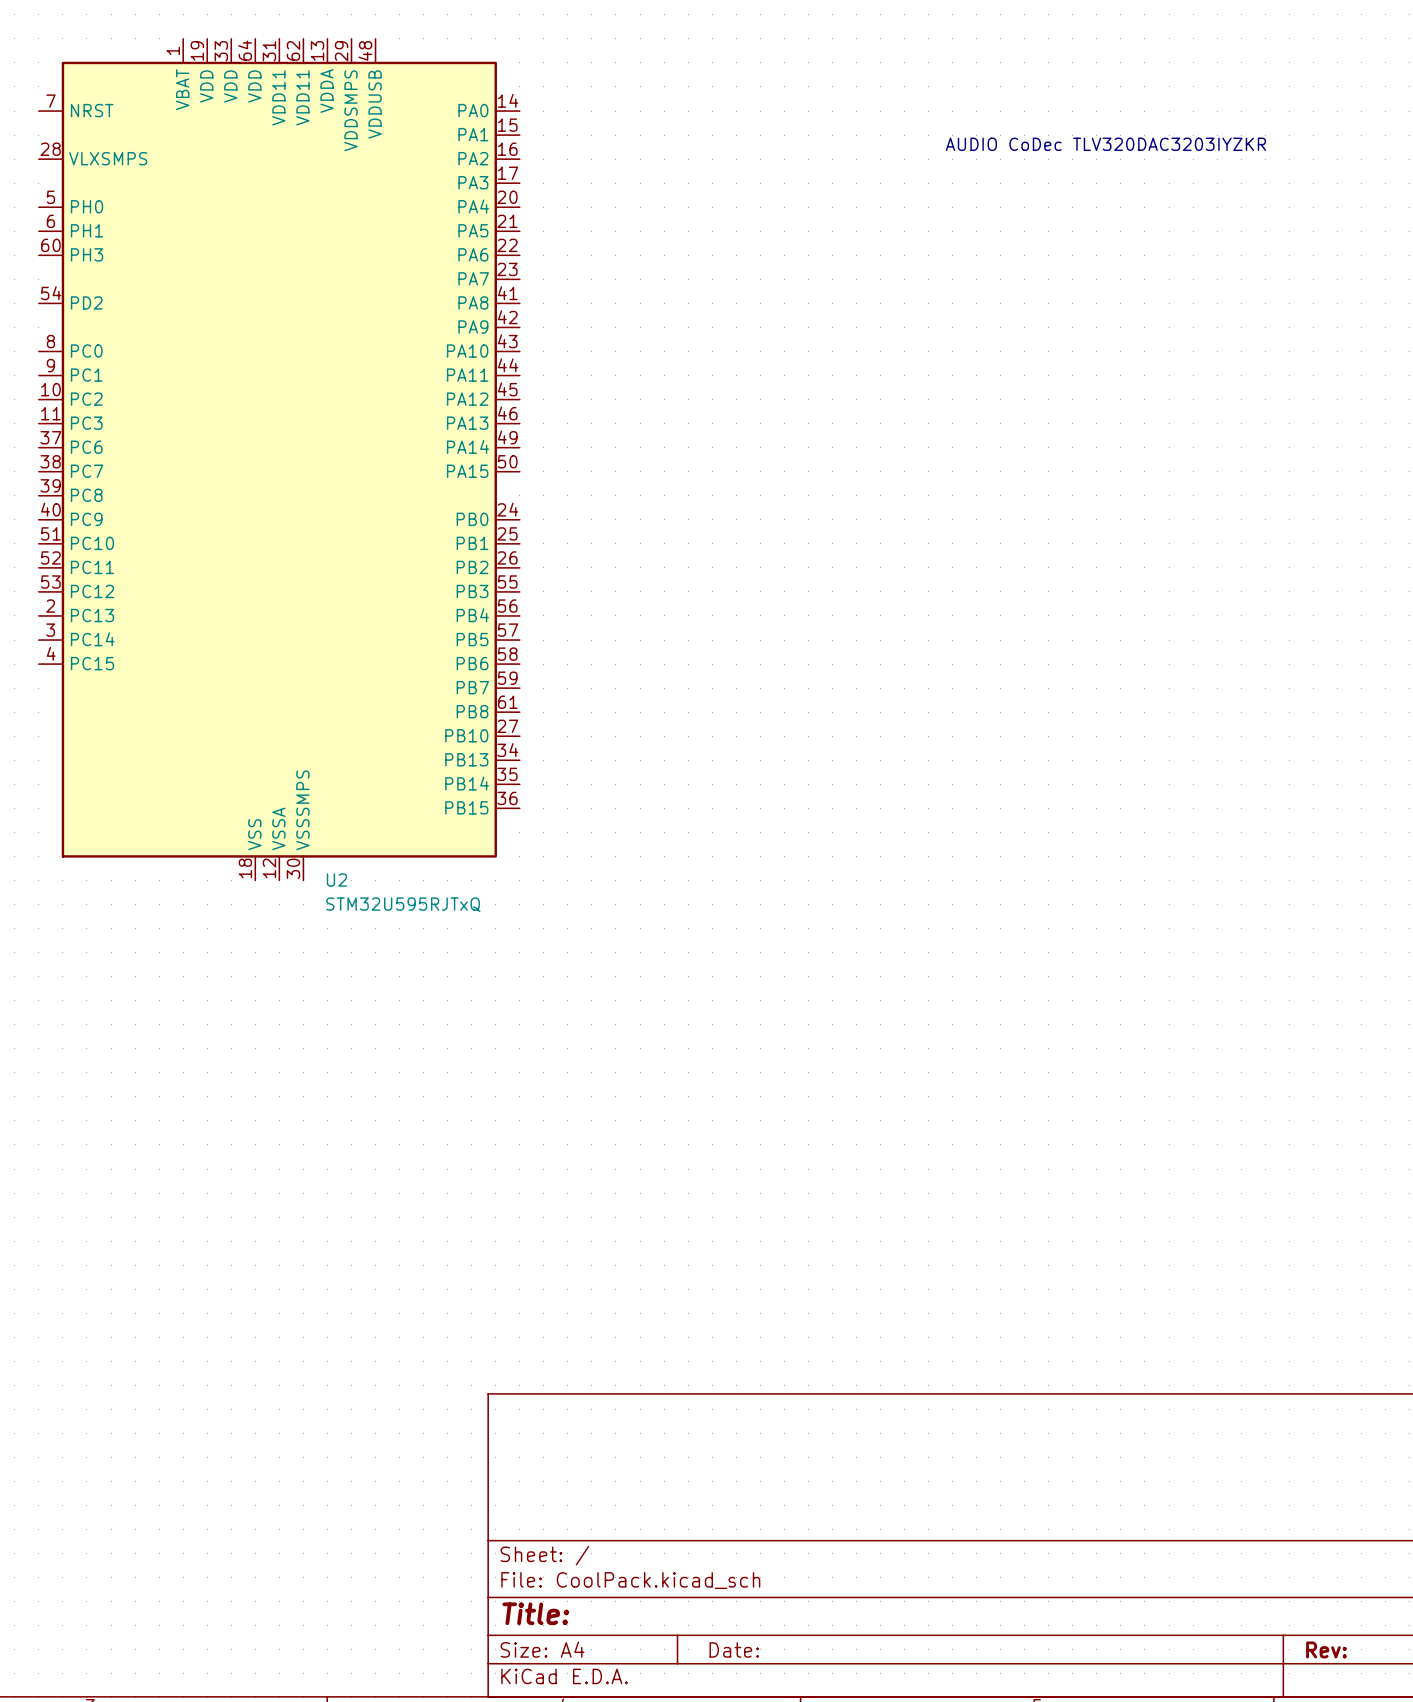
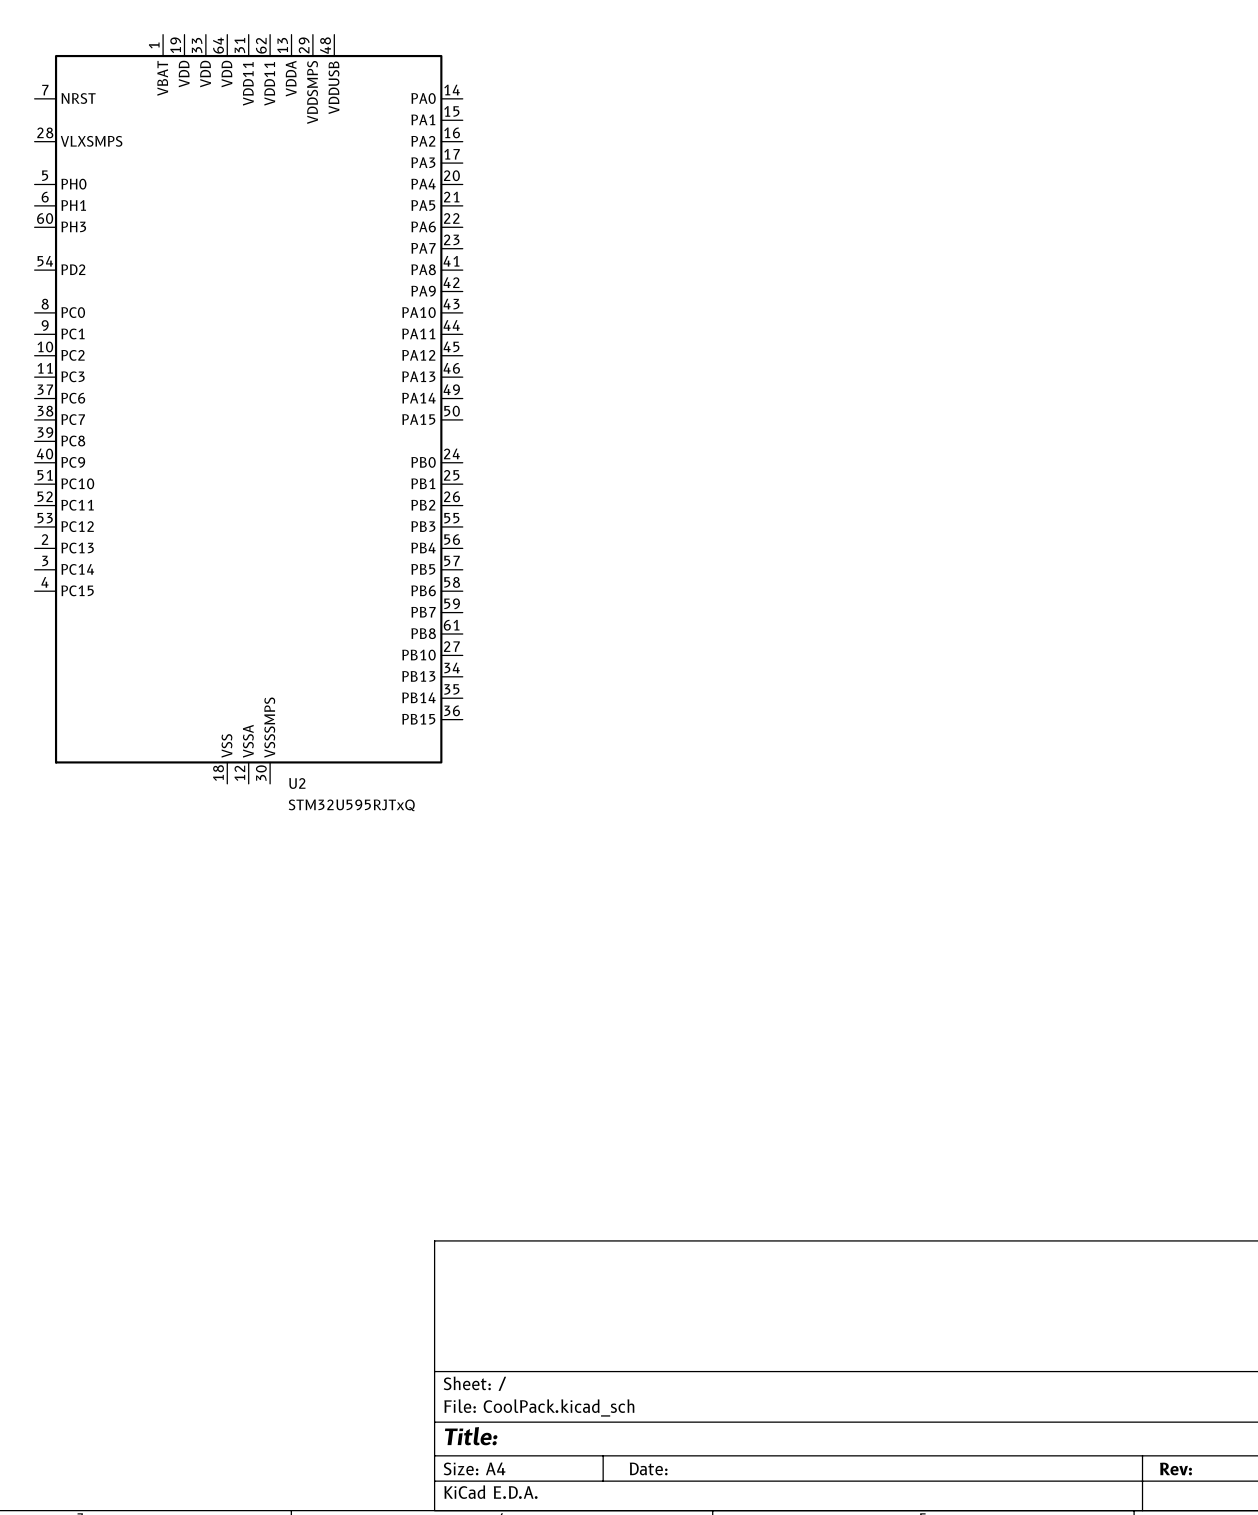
text: AUDIO CoDec TLV320DAC3203IYZKR (1105, 144) -> none

